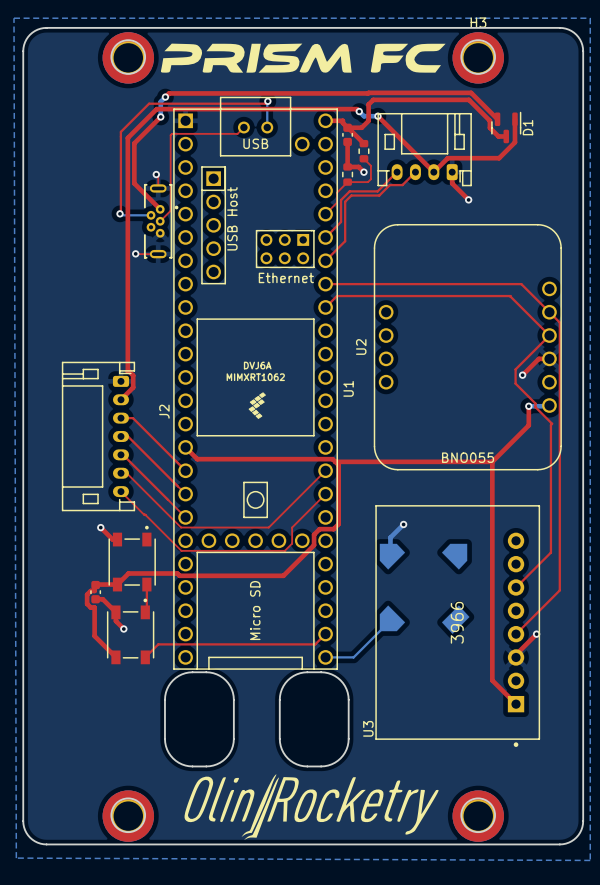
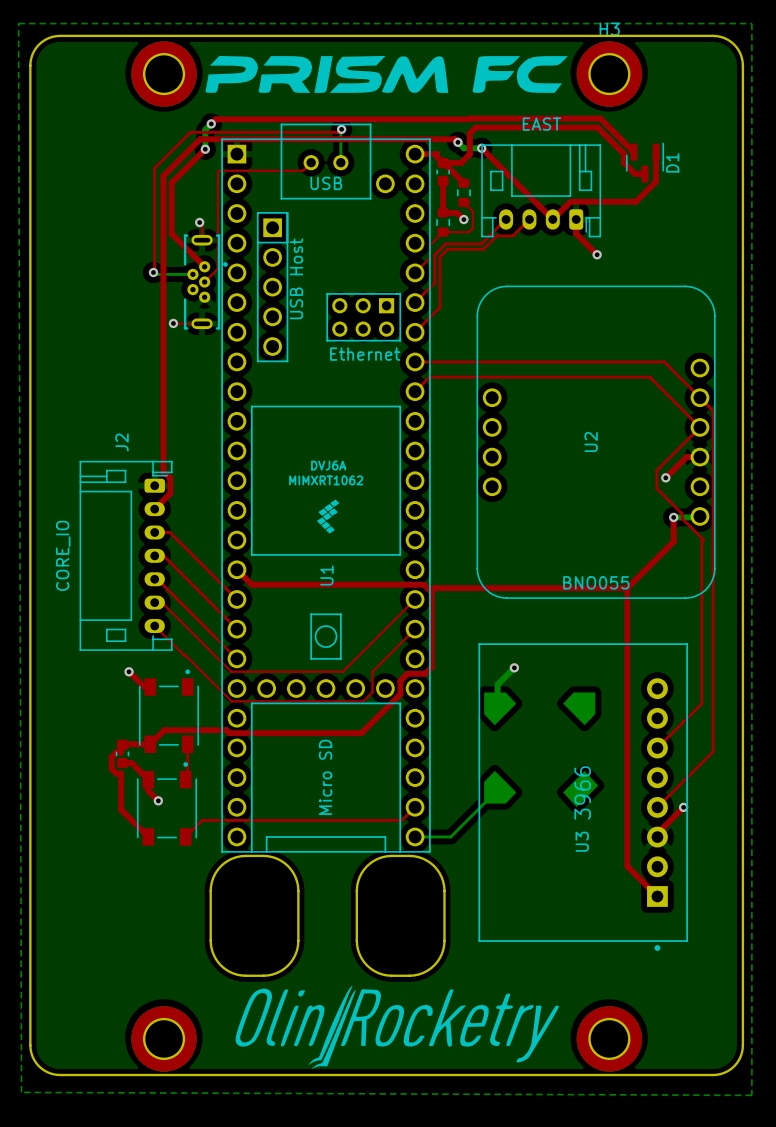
round board edge: [110, 39, 147, 75] -> none
round board edge: [460, 39, 496, 75] -> none
part value: none -> EAST (541, 124)
U2 name position: U2 (361, 346) -> U2 (591, 441)
U1 name position: U1 (348, 388) -> U1 (326, 575)
J2 name position: J2 (164, 411) -> J2 (122, 442)
J2 value: none -> CORE_IO (63, 555)
U3 name position: U3 (368, 728) -> U3 (582, 841)
round board edge: [110, 797, 147, 834] -> none
round board edge: [460, 797, 496, 834] -> none

